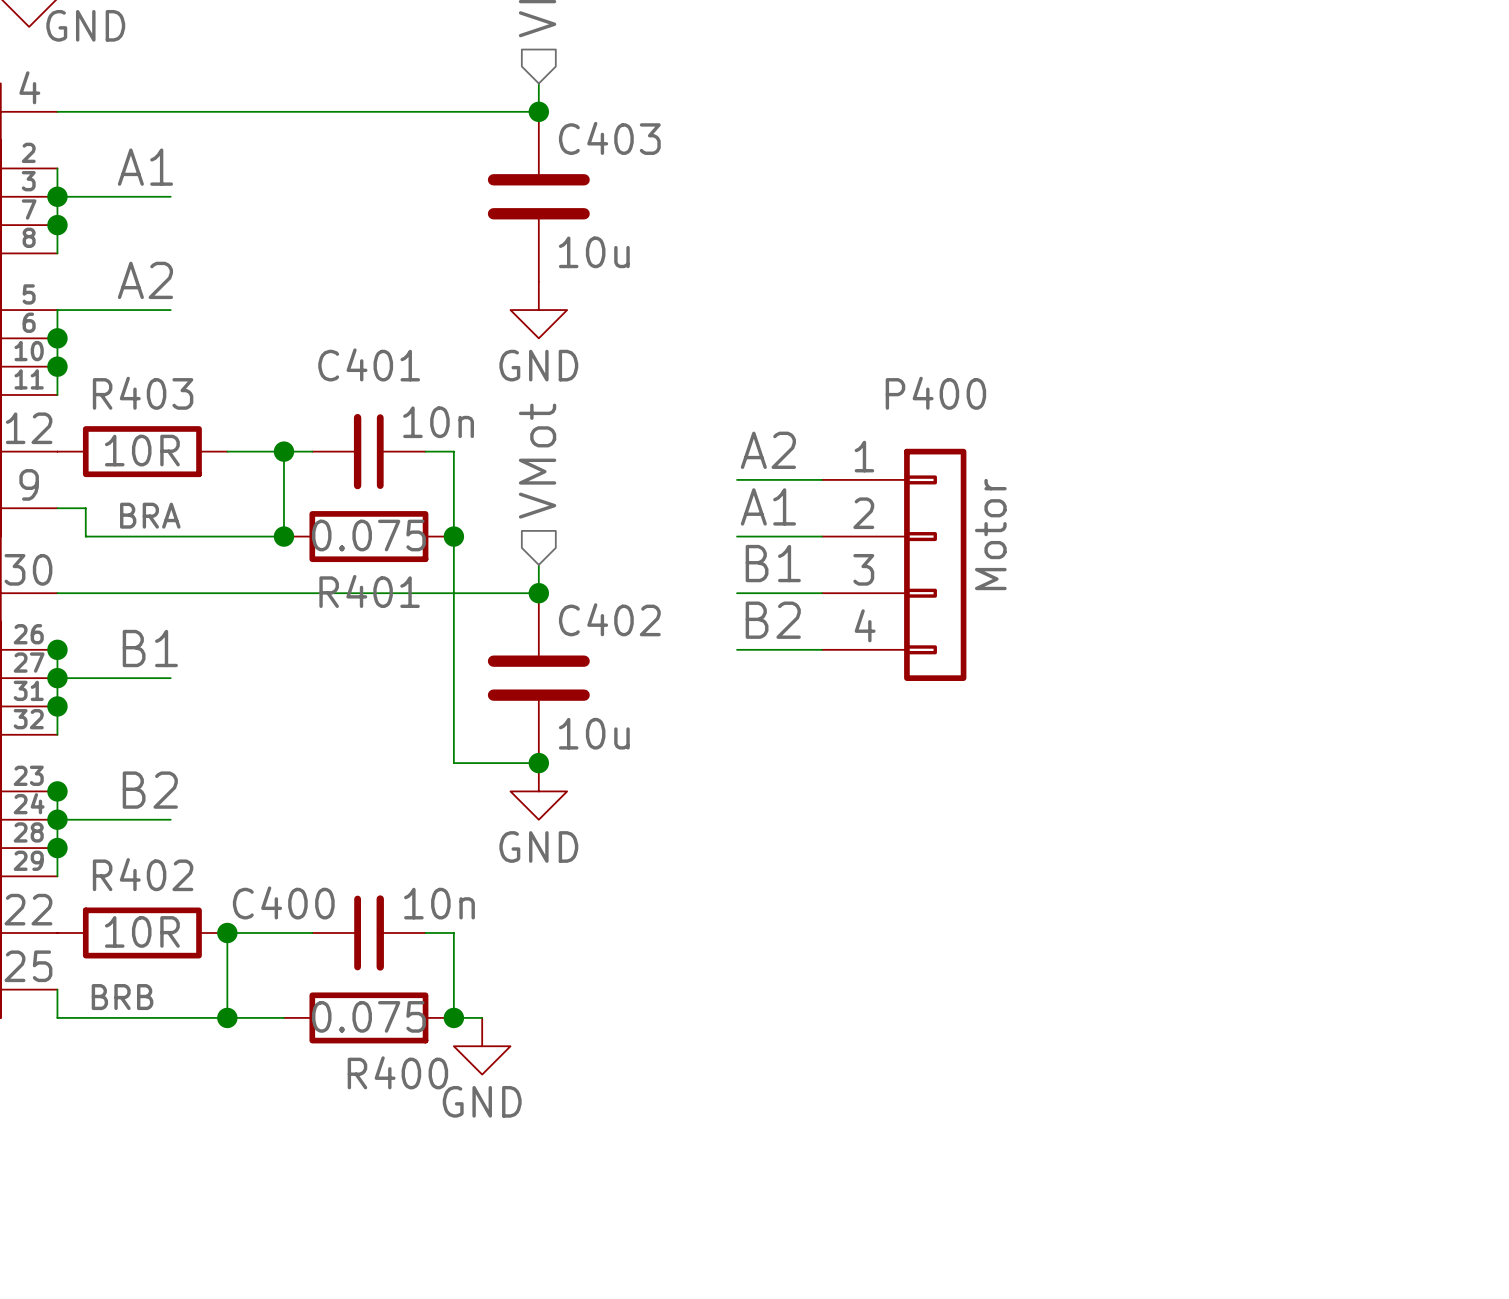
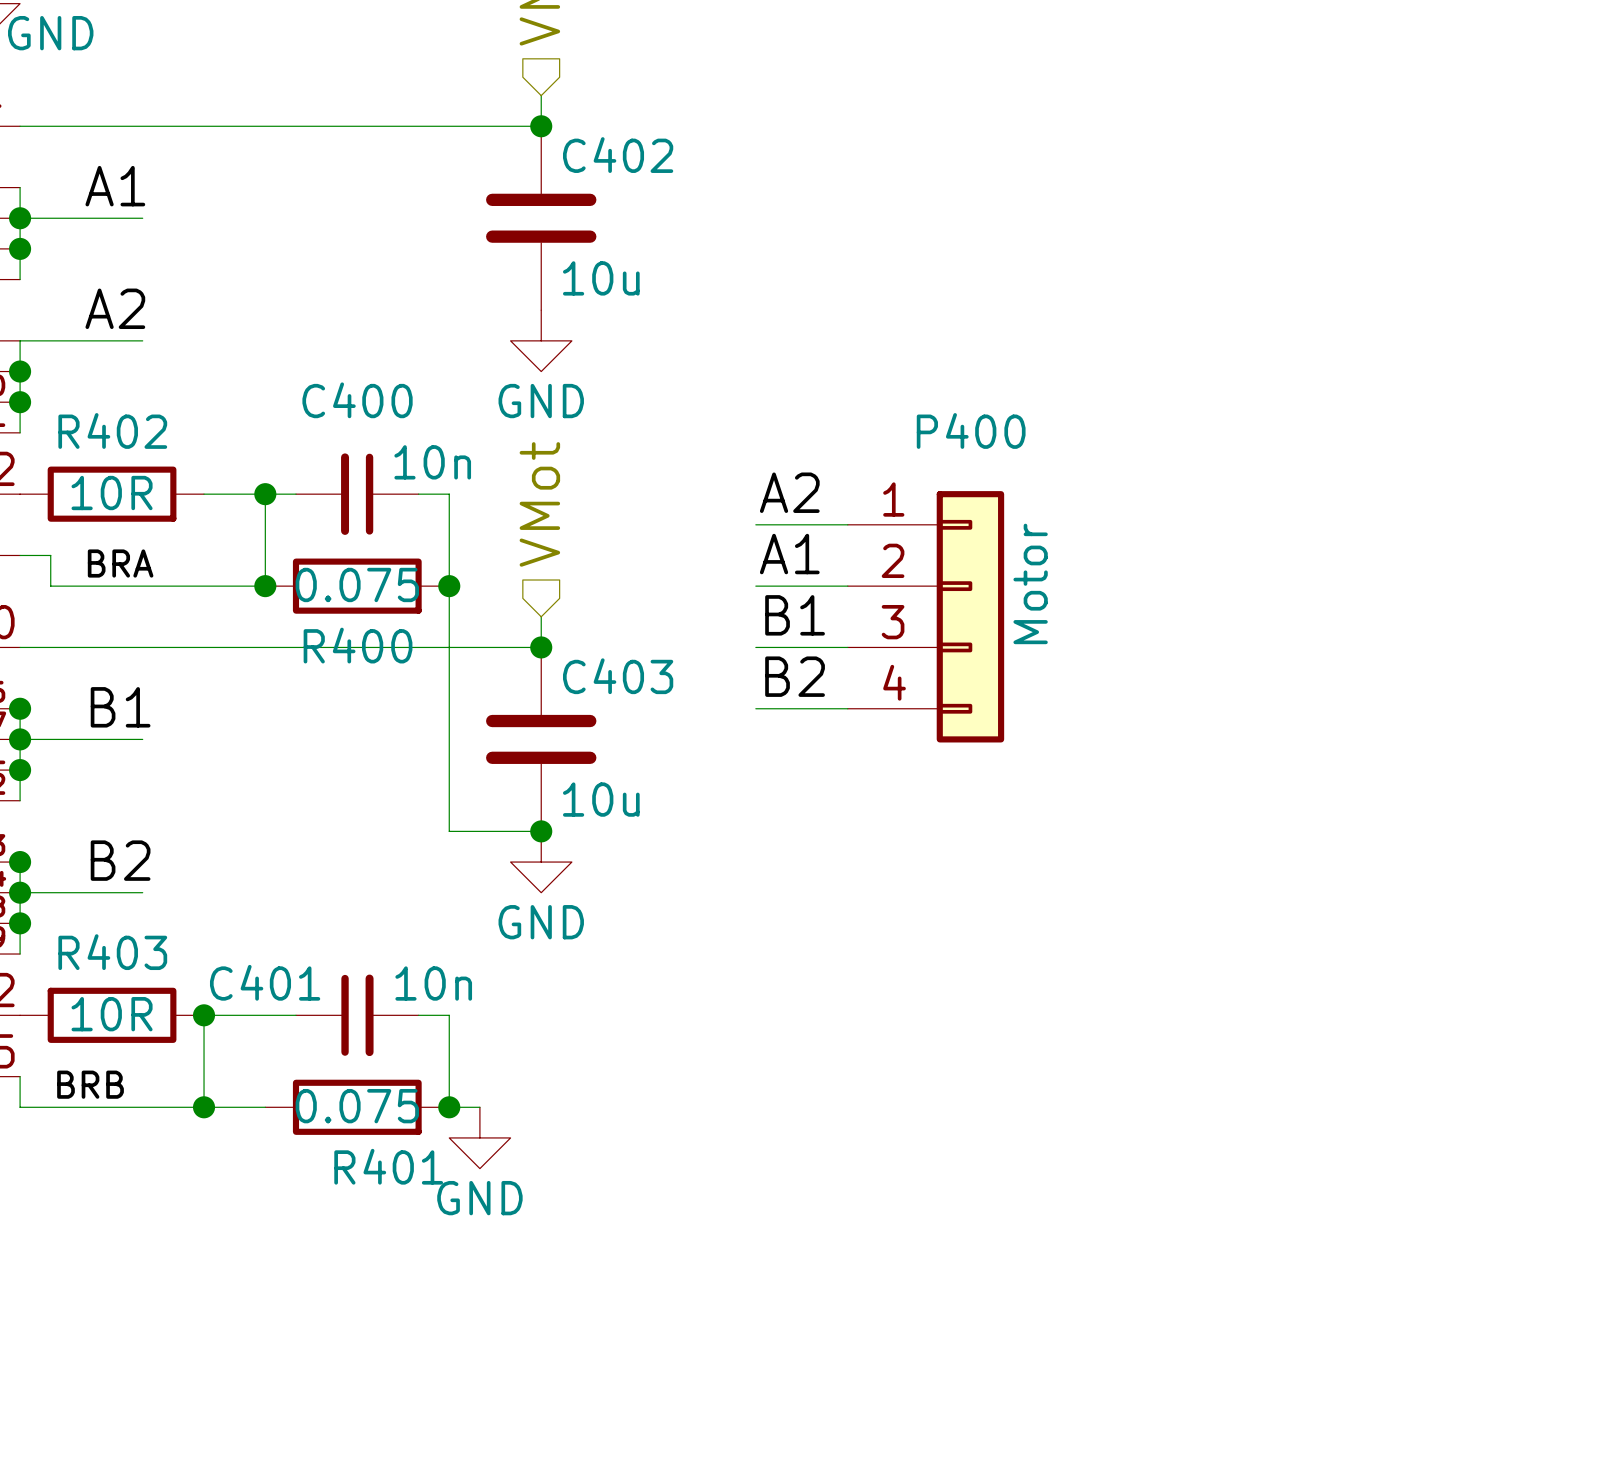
C403 name: C403 (609, 138) -> C402 (618, 155)
C401 name: C401 (369, 364) -> C400 (357, 400)
R403 name: R403 (143, 393) -> R402 (112, 430)
R401 name: R401 (369, 591) -> R400 (358, 645)
C402 name: C402 (609, 619) -> C403 (618, 676)
R402 name: R402 (143, 874) -> R403 (112, 952)
C400 name: C400 (283, 902) -> C401 (265, 982)
R400 name: R400 (397, 1072) -> R401 (388, 1166)

